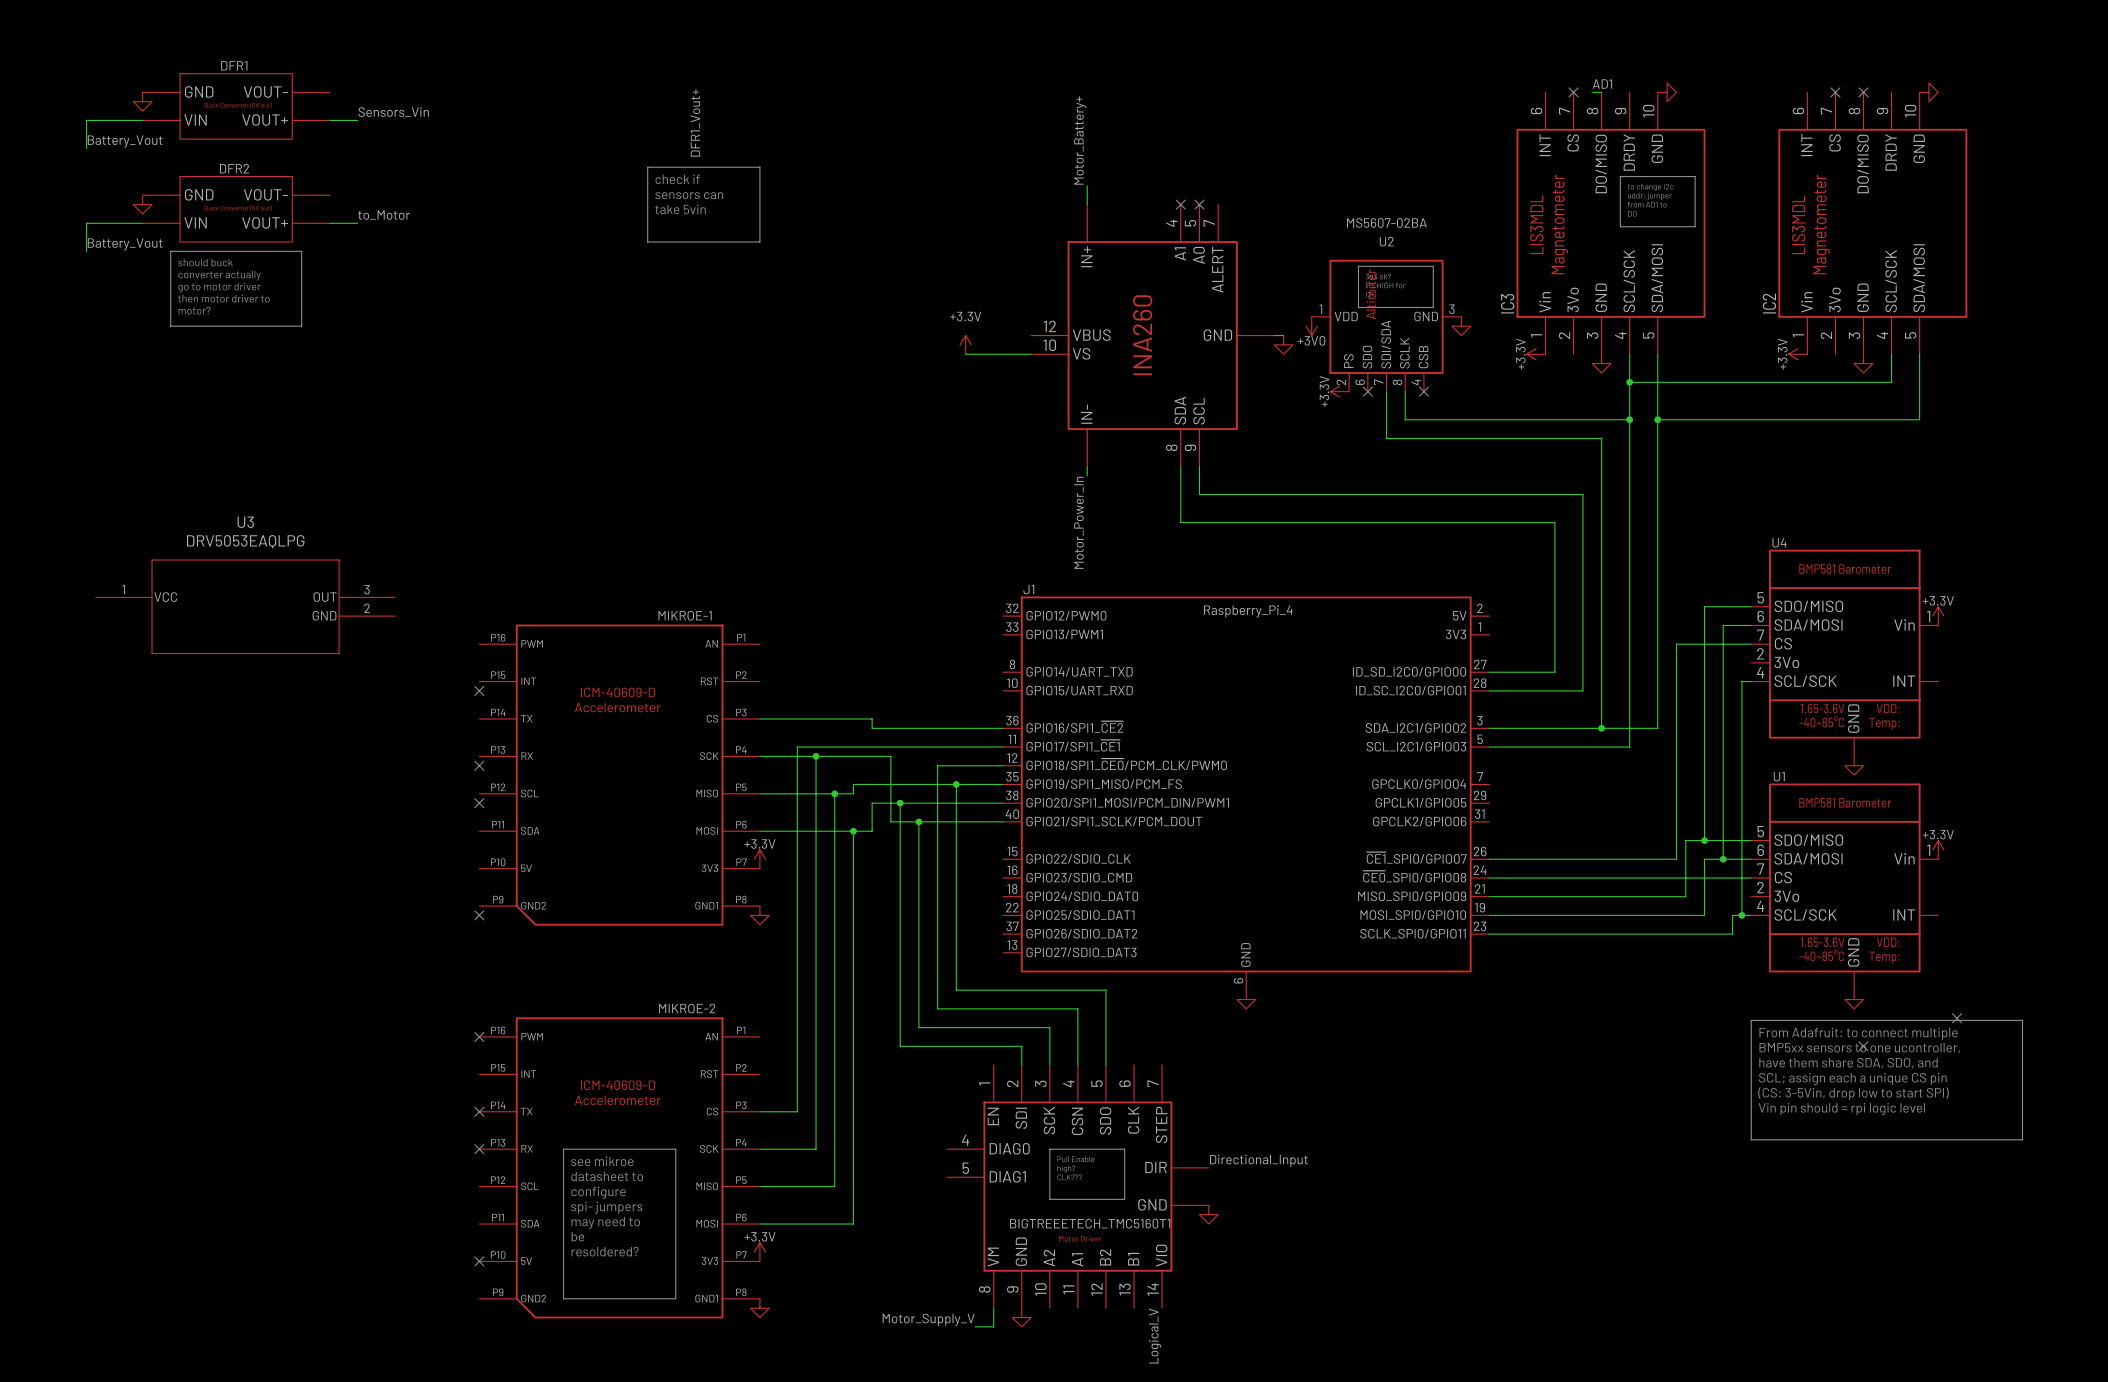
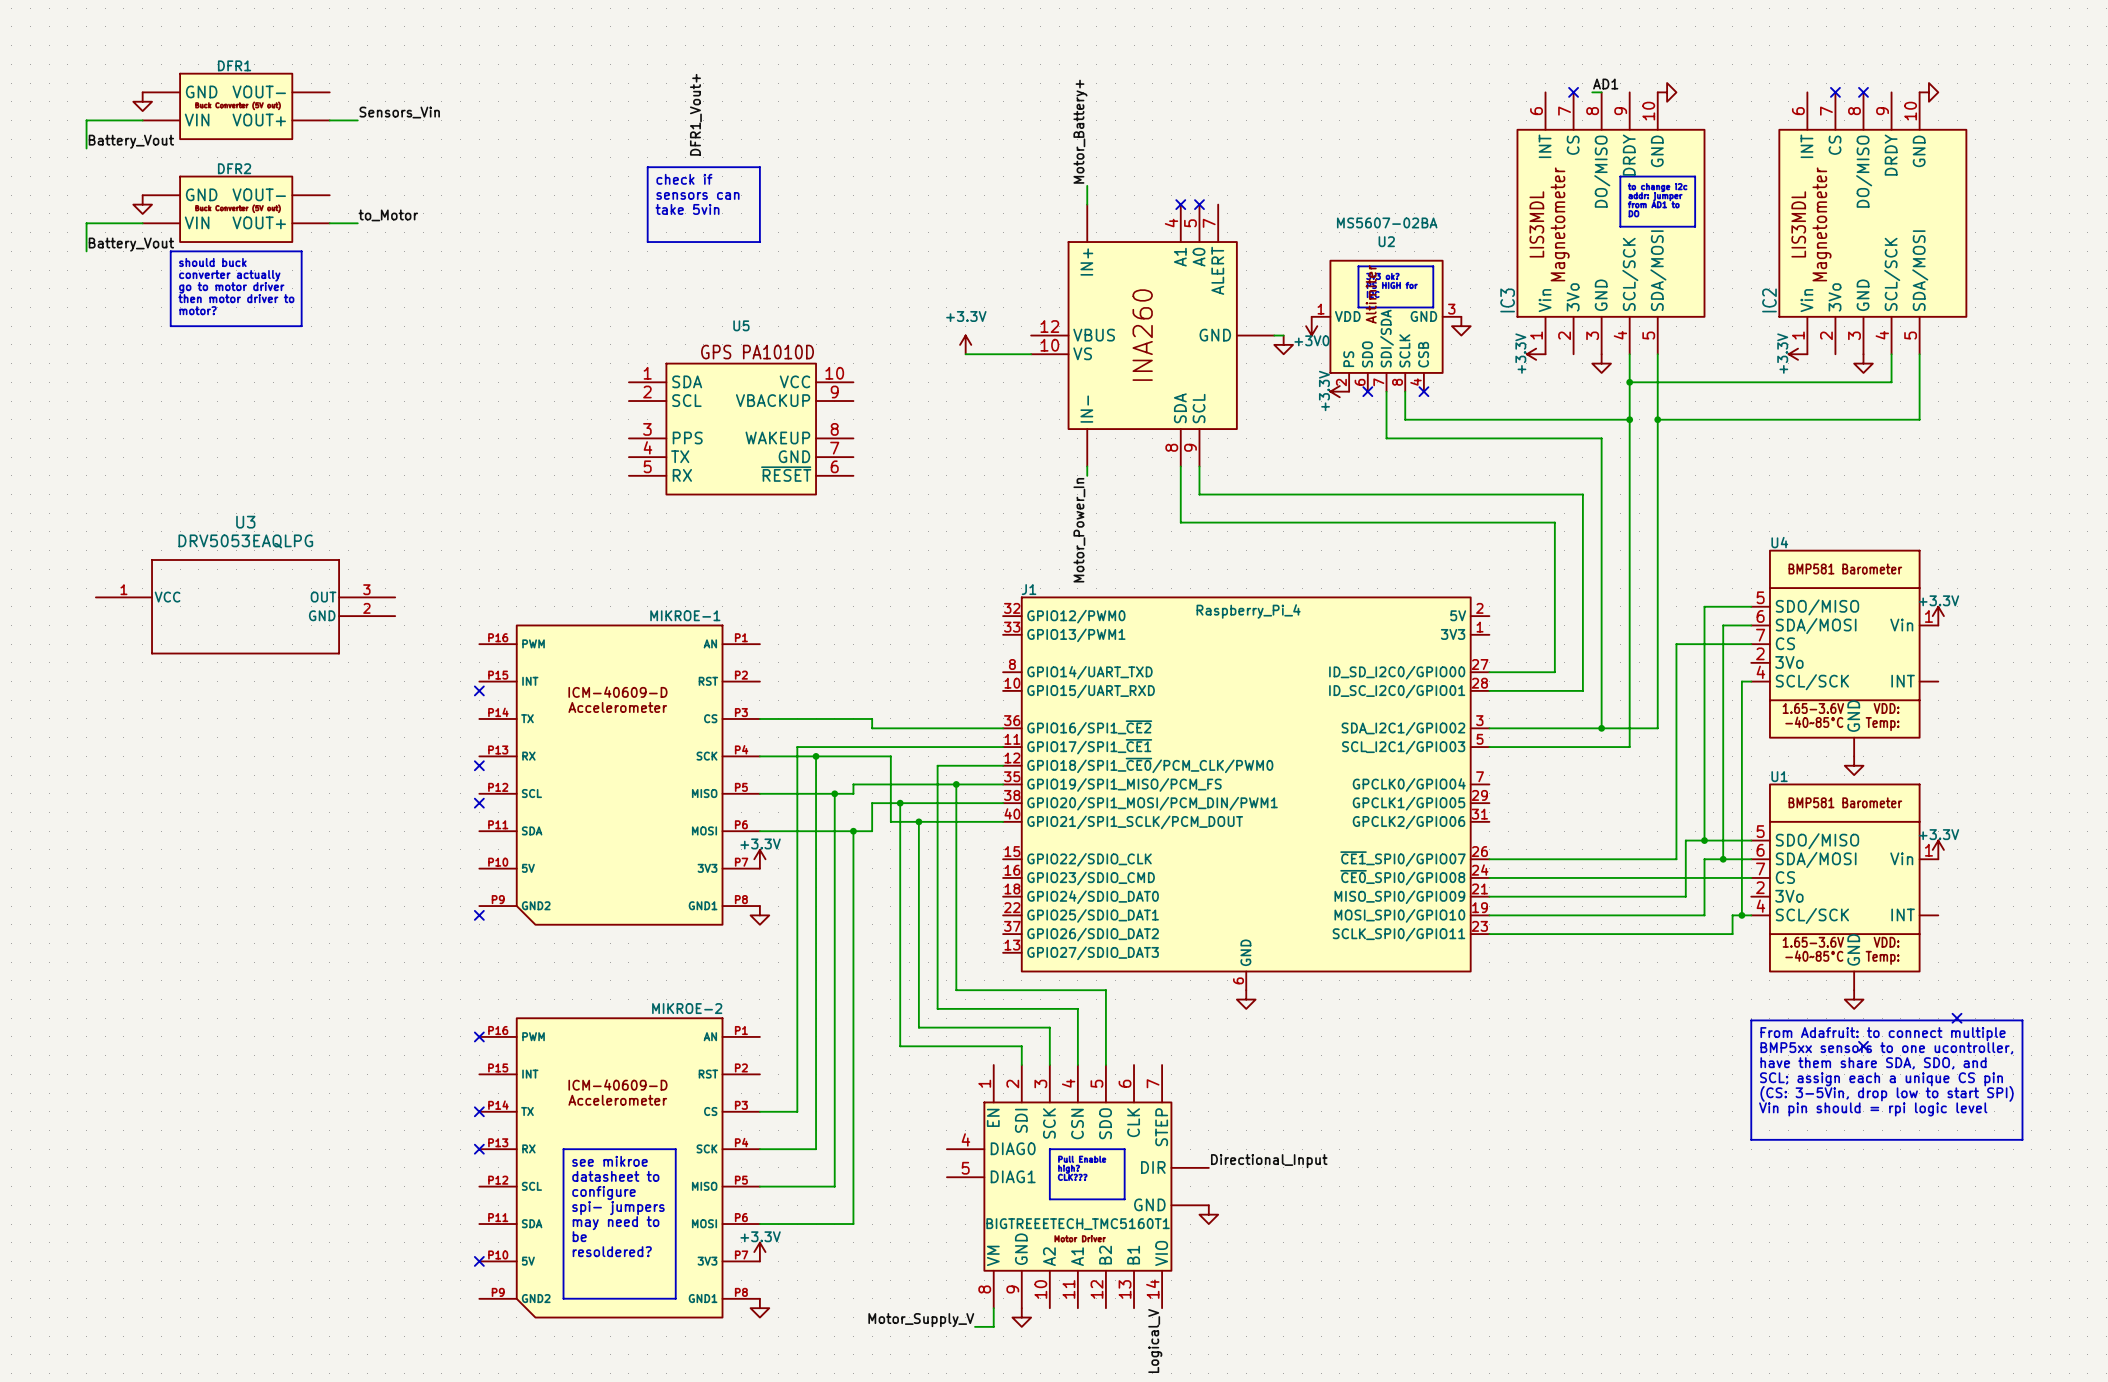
U5: none -> (741, 429)

